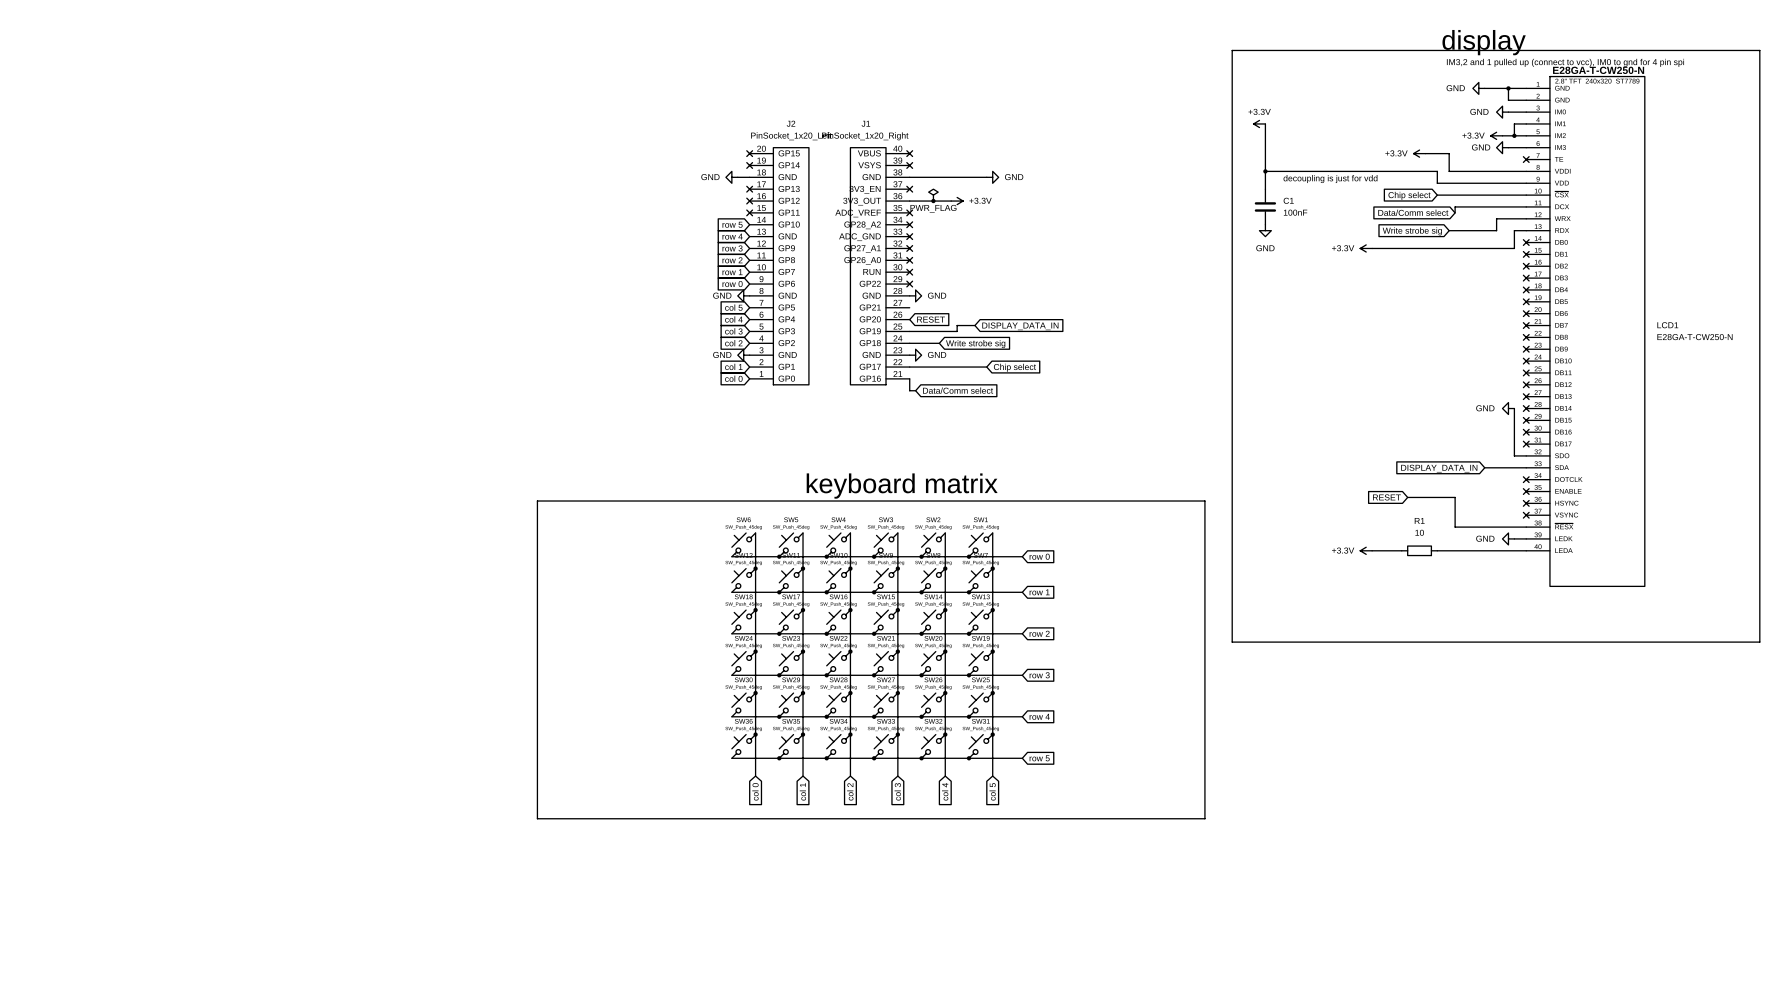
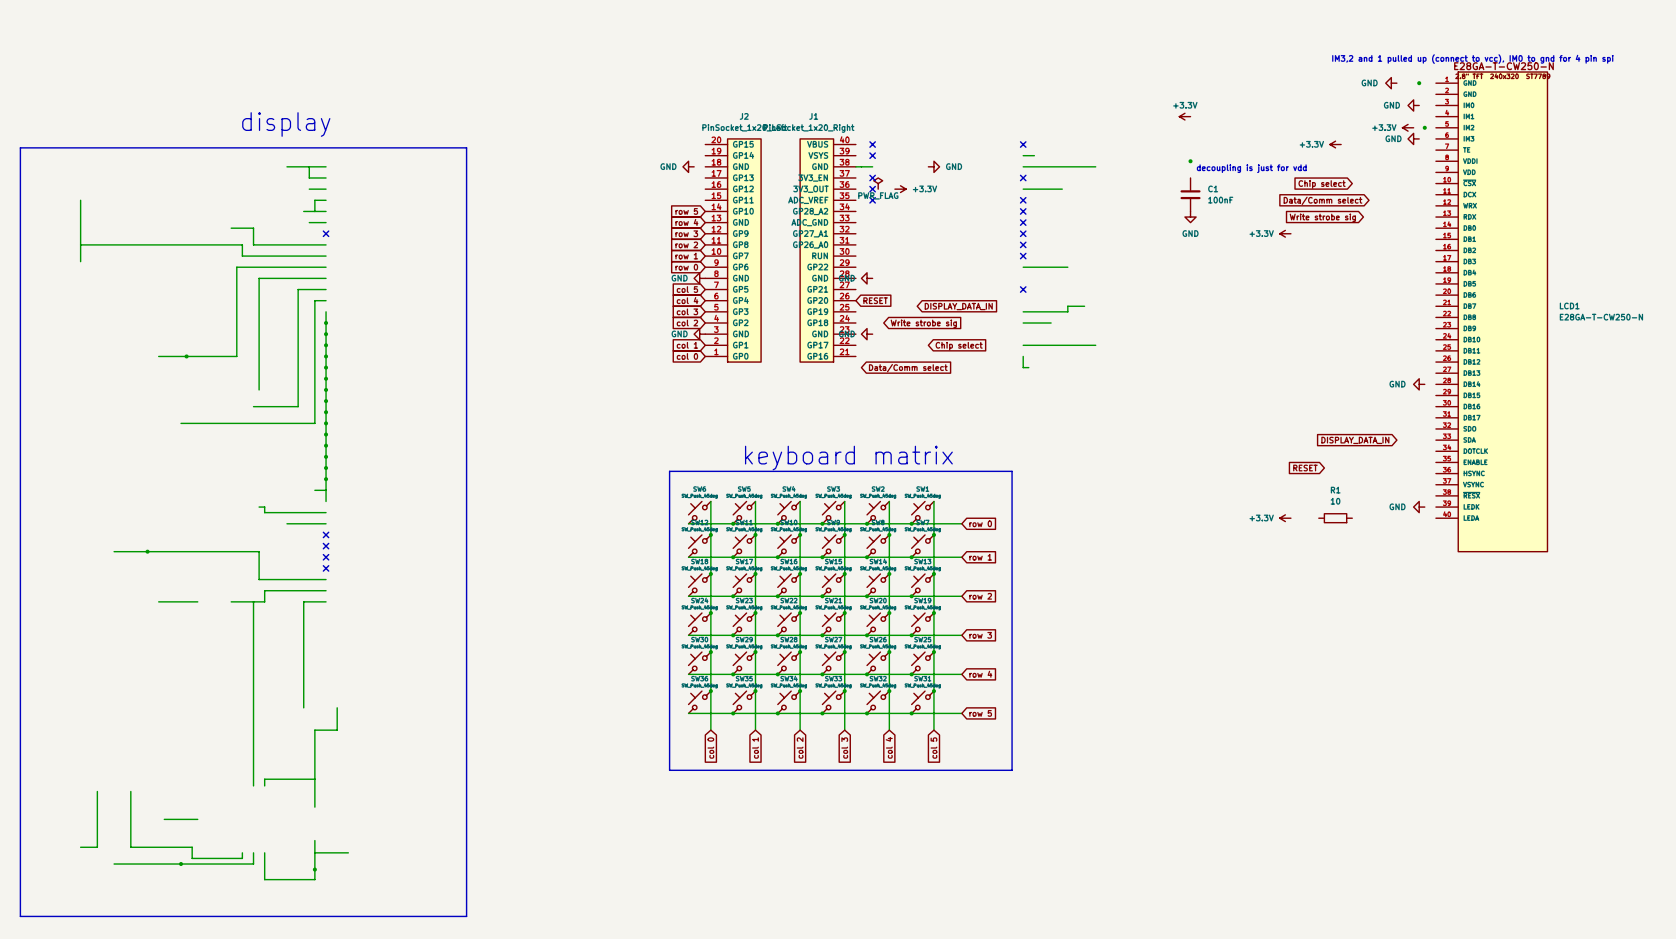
text: display (1484, 42) -> none
line: (1232, 50) (1759, 50) (1759, 642) (1232, 642) (1232, 50) -> none
wire: (1484, 88) (1526, 88) -> none
wire: (1508, 88) (1508, 100) (1526, 100) -> none
wire: (1508, 112) (1526, 112) -> none
wire: (1265, 123) (1265, 189) -> none
wire: (1526, 123) (1514, 123) (1514, 135) -> none
text: none -> display (286, 124)
wire: (1502, 135) (1526, 135) -> none
wire: (1508, 147) (1526, 147) -> none
no-connect mark: (749, 153) -> none
no-connect mark: (909, 153) -> none
no-connect mark: none -> (872, 144)
no-connect mark: none -> (1023, 144)
wire: (1425, 153) (1449, 153) (1449, 171) (1526, 171) -> none
line: none -> (20, 147) (466, 147) (466, 916) (20, 916) (20, 147)
no-connect mark: (1526, 159) -> none
no-connect mark: (749, 165) -> none
no-connect mark: (909, 165) -> none
no-connect mark: none -> (872, 155)
wire: none -> (1023, 155) (1034, 155)
wire: (1265, 171) (1437, 171) (1437, 183) (1526, 183) -> none
wire: none -> (286, 166) (326, 166)
wire: none -> (309, 166) (309, 177) (326, 177)
wire: (737, 177) (749, 177) -> none
wire: (927, 177) (986, 177) -> none
wire: none -> (1023, 166) (1095, 166)
no-connect mark: (749, 189) -> none
no-connect mark: (909, 189) -> none
no-connect mark: none -> (872, 177)
no-connect mark: none -> (1023, 177)
wire: (1437, 195) (1526, 195) -> none
wire: none -> (309, 189) (326, 189)
no-connect mark: (749, 201) -> none
wire: (909, 201) (951, 201) -> none
no-connect mark: none -> (872, 189)
junction: (933, 201) -> none
wire: none -> (1023, 189) (1062, 189)
wire: (1526, 206) (1455, 206) (1455, 212) -> none
wire: none -> (80, 200) (80, 261)
wire: none -> (326, 200) (314, 200) (314, 211)
no-connect mark: (749, 212) -> none
no-connect mark: (909, 212) -> none
no-connect mark: none -> (872, 200)
no-connect mark: none -> (1023, 200)
wire: (1526, 218) (1496, 218) (1496, 230) (1449, 230) -> none
wire: none -> (303, 211) (326, 211)
no-connect mark: (909, 224) -> none
no-connect mark: none -> (1023, 211)
wire: (1526, 230) (1514, 230) (1514, 248) (1372, 248) -> none
wire: none -> (309, 222) (326, 222)
no-connect mark: (909, 236) -> none
no-connect mark: none -> (1023, 222)
wire: none -> (231, 228) (253, 228) (253, 244) (326, 244)
no-connect mark: (1526, 242) -> none
no-connect mark: none -> (326, 233)
no-connect mark: (909, 248) -> none
no-connect mark: none -> (1023, 233)
no-connect mark: (1526, 254) -> none
wire: none -> (80, 244) (242, 244) (242, 256) (326, 256)
no-connect mark: (909, 260) -> none
no-connect mark: none -> (1023, 244)
no-connect mark: (1526, 266) -> none
no-connect mark: (909, 272) -> none
no-connect mark: none -> (1023, 256)
no-connect mark: (1526, 278) -> none
wire: none -> (326, 267) (236, 267) (236, 356) (158, 356)
no-connect mark: (909, 284) -> none
wire: none -> (1023, 267) (1067, 267)
no-connect mark: (1526, 289) -> none
wire: none -> (326, 278) (259, 278) (259, 389)
power symbol rotation: 0° (915, 295) -> 180° (867, 278)
no-connect mark: (1526, 301) -> none
wire: none -> (326, 289) (298, 289) (298, 406) (253, 406)
no-connect mark: none -> (1023, 289)
no-connect mark: (1526, 313) -> none
wire: none -> (326, 300) (314, 300) (314, 423) (181, 423)
wire: (974, 325) (957, 325) (957, 331) (909, 331) -> none
wire: none -> (1084, 306) (1067, 306) (1067, 311) (1023, 311)
no-connect mark: (1526, 325) -> none
wire: none -> (326, 311) (326, 501)
no-connect mark: (1526, 337) -> none
junction: none -> (326, 323)
wire: (909, 343) (939, 343) -> none
wire: none -> (1023, 323) (1051, 323)
no-connect mark: (1526, 349) -> none
junction: none -> (326, 334)
power symbol rotation: 0° (915, 355) -> 180° (867, 334)
no-connect mark: (1526, 361) -> none
junction: none -> (326, 345)
wire: (909, 367) (986, 367) -> none
wire: none -> (1023, 345) (1095, 345)
no-connect mark: (1526, 372) -> none
junction: none -> (186, 356)
junction: none -> (326, 356)
wire: (909, 378) (909, 390) (915, 390) -> none
wire: none -> (1023, 356) (1023, 367) (1028, 367)
no-connect mark: (1526, 384) -> none
junction: none -> (326, 367)
no-connect mark: (1526, 396) -> none
junction: none -> (326, 378)
wire: (1514, 408) (1514, 455) (1526, 455) -> none
no-connect mark: (1526, 408) -> none
junction: none -> (326, 389)
no-connect mark: (1526, 420) -> none
junction: none -> (326, 401)
no-connect mark: (1526, 432) -> none
junction: none -> (326, 412)
no-connect mark: (1526, 444) -> none
junction: none -> (326, 423)
junction: none -> (326, 434)
wire: (1484, 467) (1526, 467) -> none
junction: none -> (326, 445)
no-connect mark: (1526, 479) -> none
junction: none -> (326, 456)
no-connect mark: (1526, 491) -> none
junction: none -> (326, 468)
wire: (1407, 497) (1455, 497) (1455, 527) (1526, 527) -> none
line: (711, 501) (537, 501) (537, 818) (711, 818) -> (669, 471) (669, 770)
line: (1075, 501) (1204, 501) (1204, 818) (1075, 818) -> (1012, 471) (1012, 770)
no-connect mark: (1526, 503) -> none
junction: none -> (326, 479)
no-connect mark: (1526, 515) -> none
wire: none -> (314, 490) (326, 490)
wire: none -> (259, 507) (264, 507) (264, 512) (326, 512)
wire: (1514, 538) (1526, 538) -> none
wire: (1372, 550) (1401, 550) -> none
wire: (1437, 550) (1526, 550) -> none
wire: none -> (286, 523) (326, 523)
no-connect mark: none -> (326, 534)
no-connect mark: none -> (326, 546)
wire: none -> (114, 551) (259, 551) (259, 579) (326, 579)
junction: none -> (147, 551)
no-connect mark: none -> (326, 557)
no-connect mark: none -> (326, 568)
wire: none -> (326, 590) (264, 590) (264, 601) (231, 601)
wire: none -> (158, 601) (197, 601)
wire: none -> (253, 601) (253, 785)
wire: none -> (326, 601) (303, 601) (303, 707)
wire: none -> (337, 707) (337, 730) (314, 730) (314, 807)
wire: none -> (314, 779) (264, 779) (264, 785)
wire: none -> (97, 791) (97, 847) (80, 847)
wire: none -> (130, 791) (130, 847) (192, 847) (192, 858) (242, 858) (242, 852)
wire: none -> (164, 819) (197, 819)
wire: none -> (314, 840) (314, 879) (264, 879) (264, 852)
wire: none -> (253, 852) (253, 864) (114, 864)
wire: none -> (314, 852) (348, 852)
junction: none -> (181, 864)
junction: none -> (314, 869)

